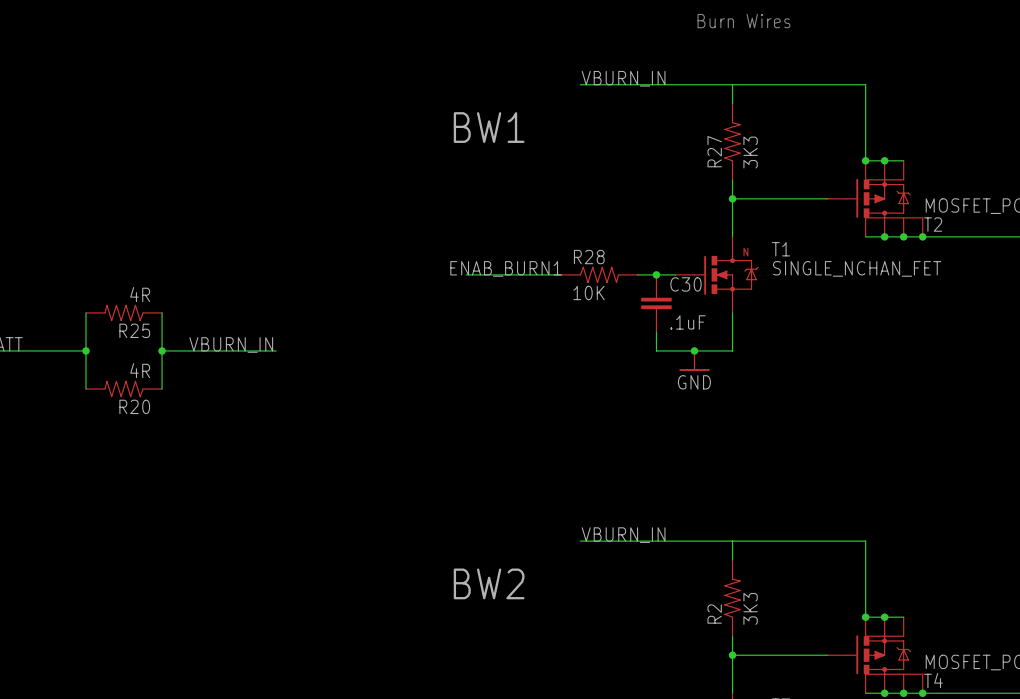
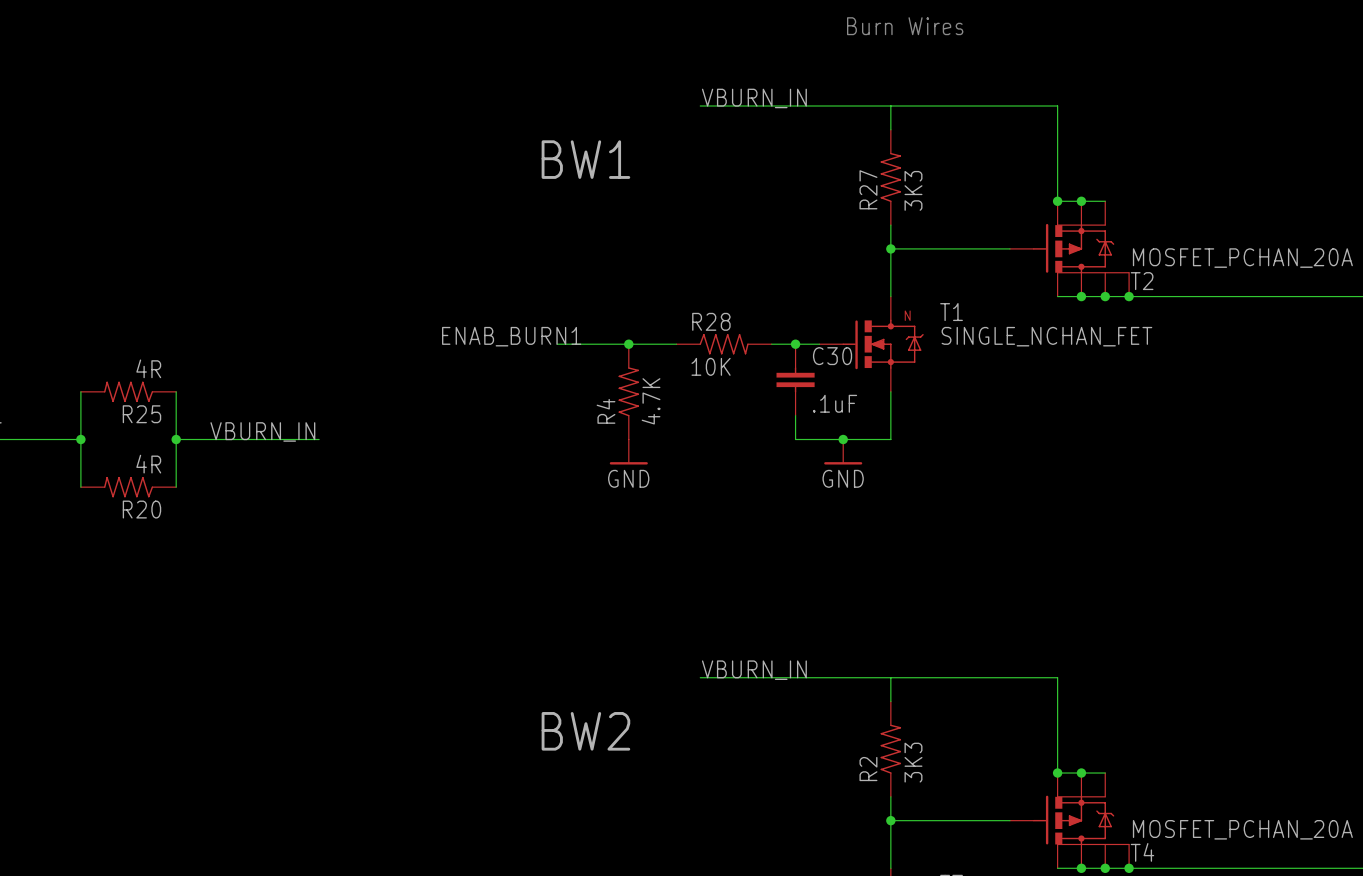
label position: ENAB_BURN1 (505, 268) -> ENAB_BURN1 (511, 336)
junction: none -> (628, 344)
R4: none -> 4.7K (628, 391)
power symbol: none -> GND (628, 452)

